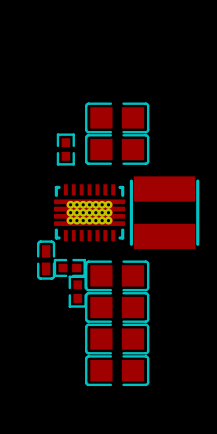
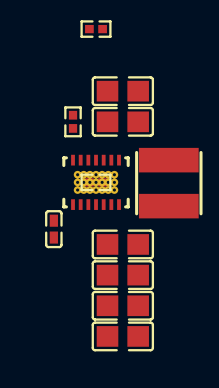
part: none -> (96, 29)
part footprint: [54, 184, 126, 246] -> [62, 154, 130, 215]
part: none -> (96, 182)
part: (69, 267) -> none
part: (77, 291) -> none

